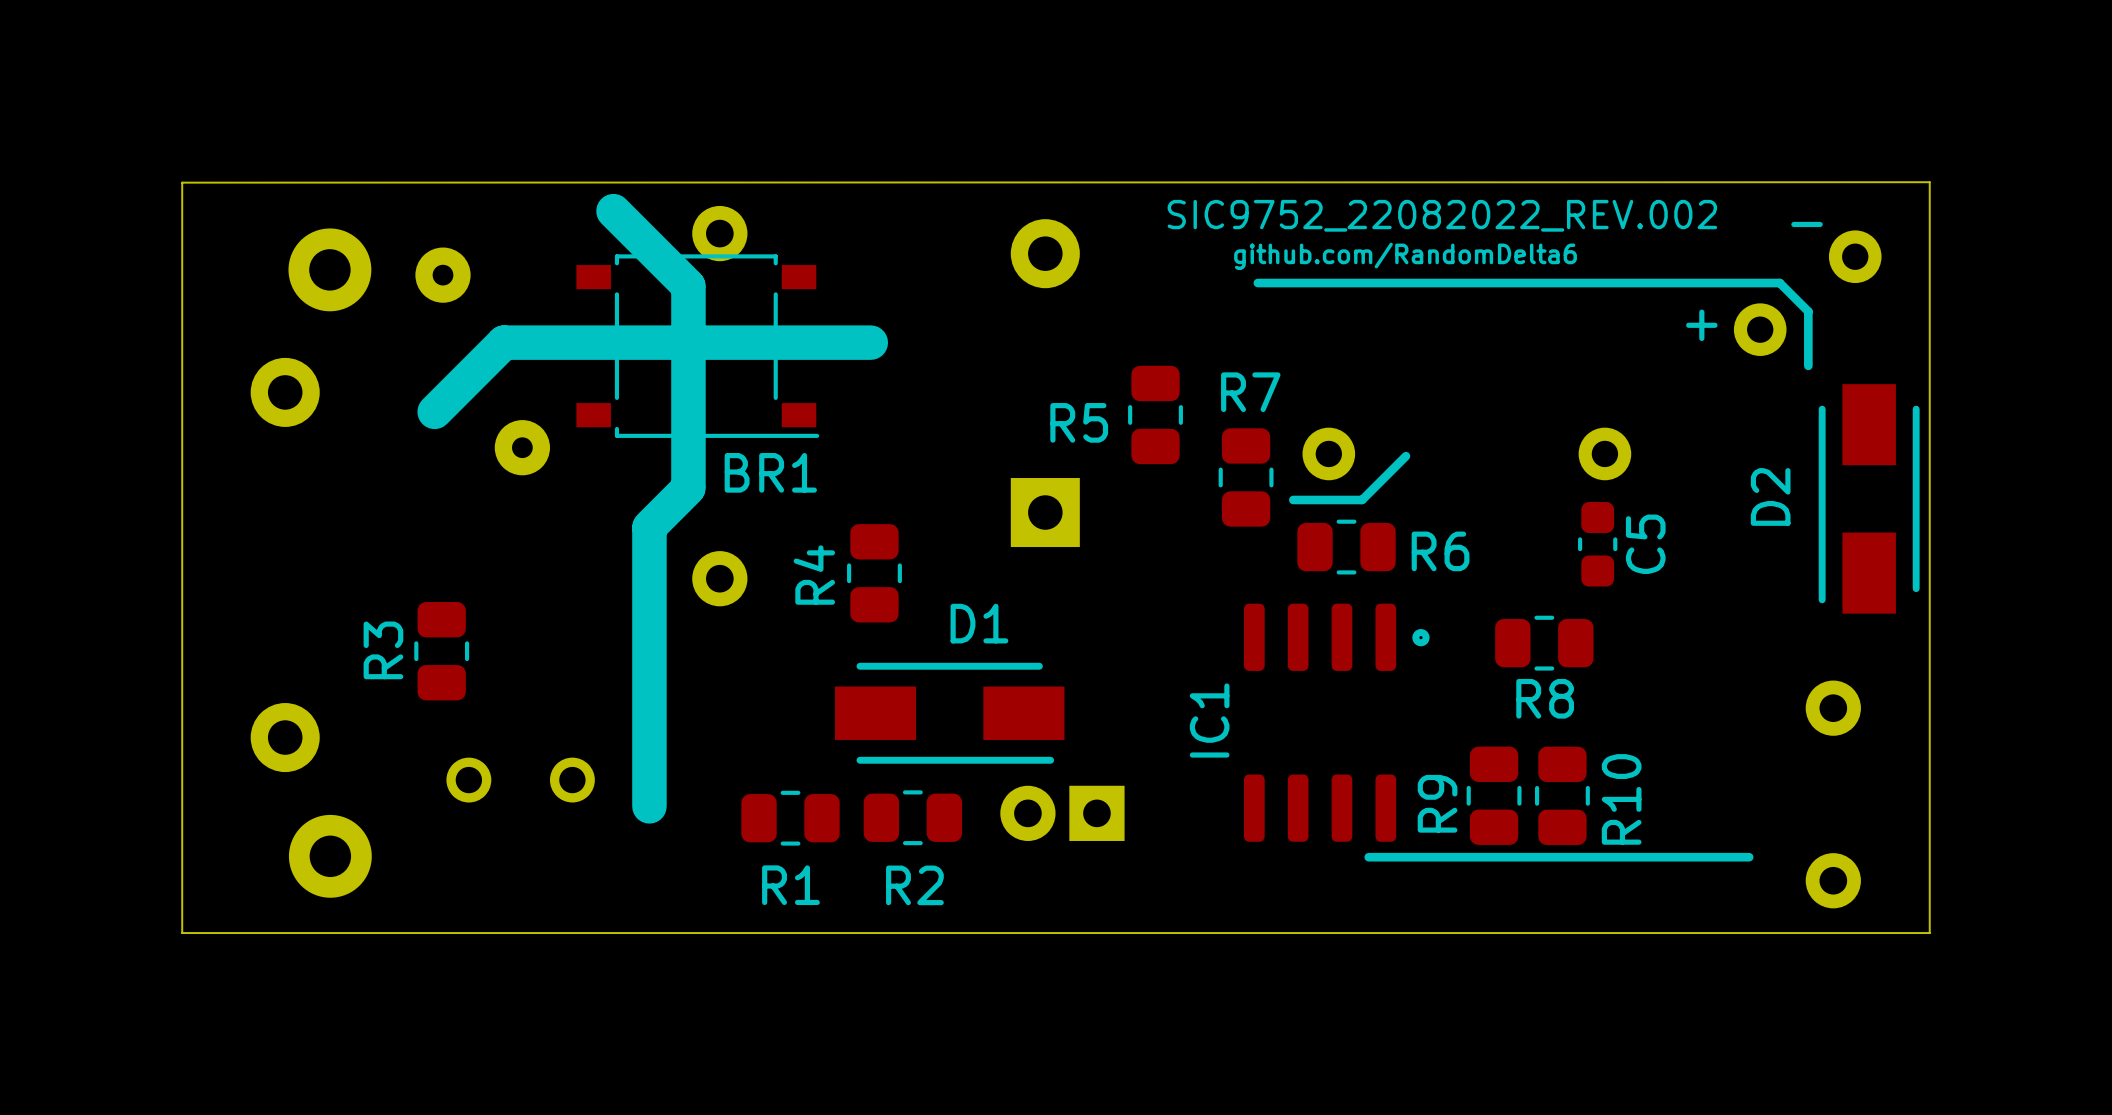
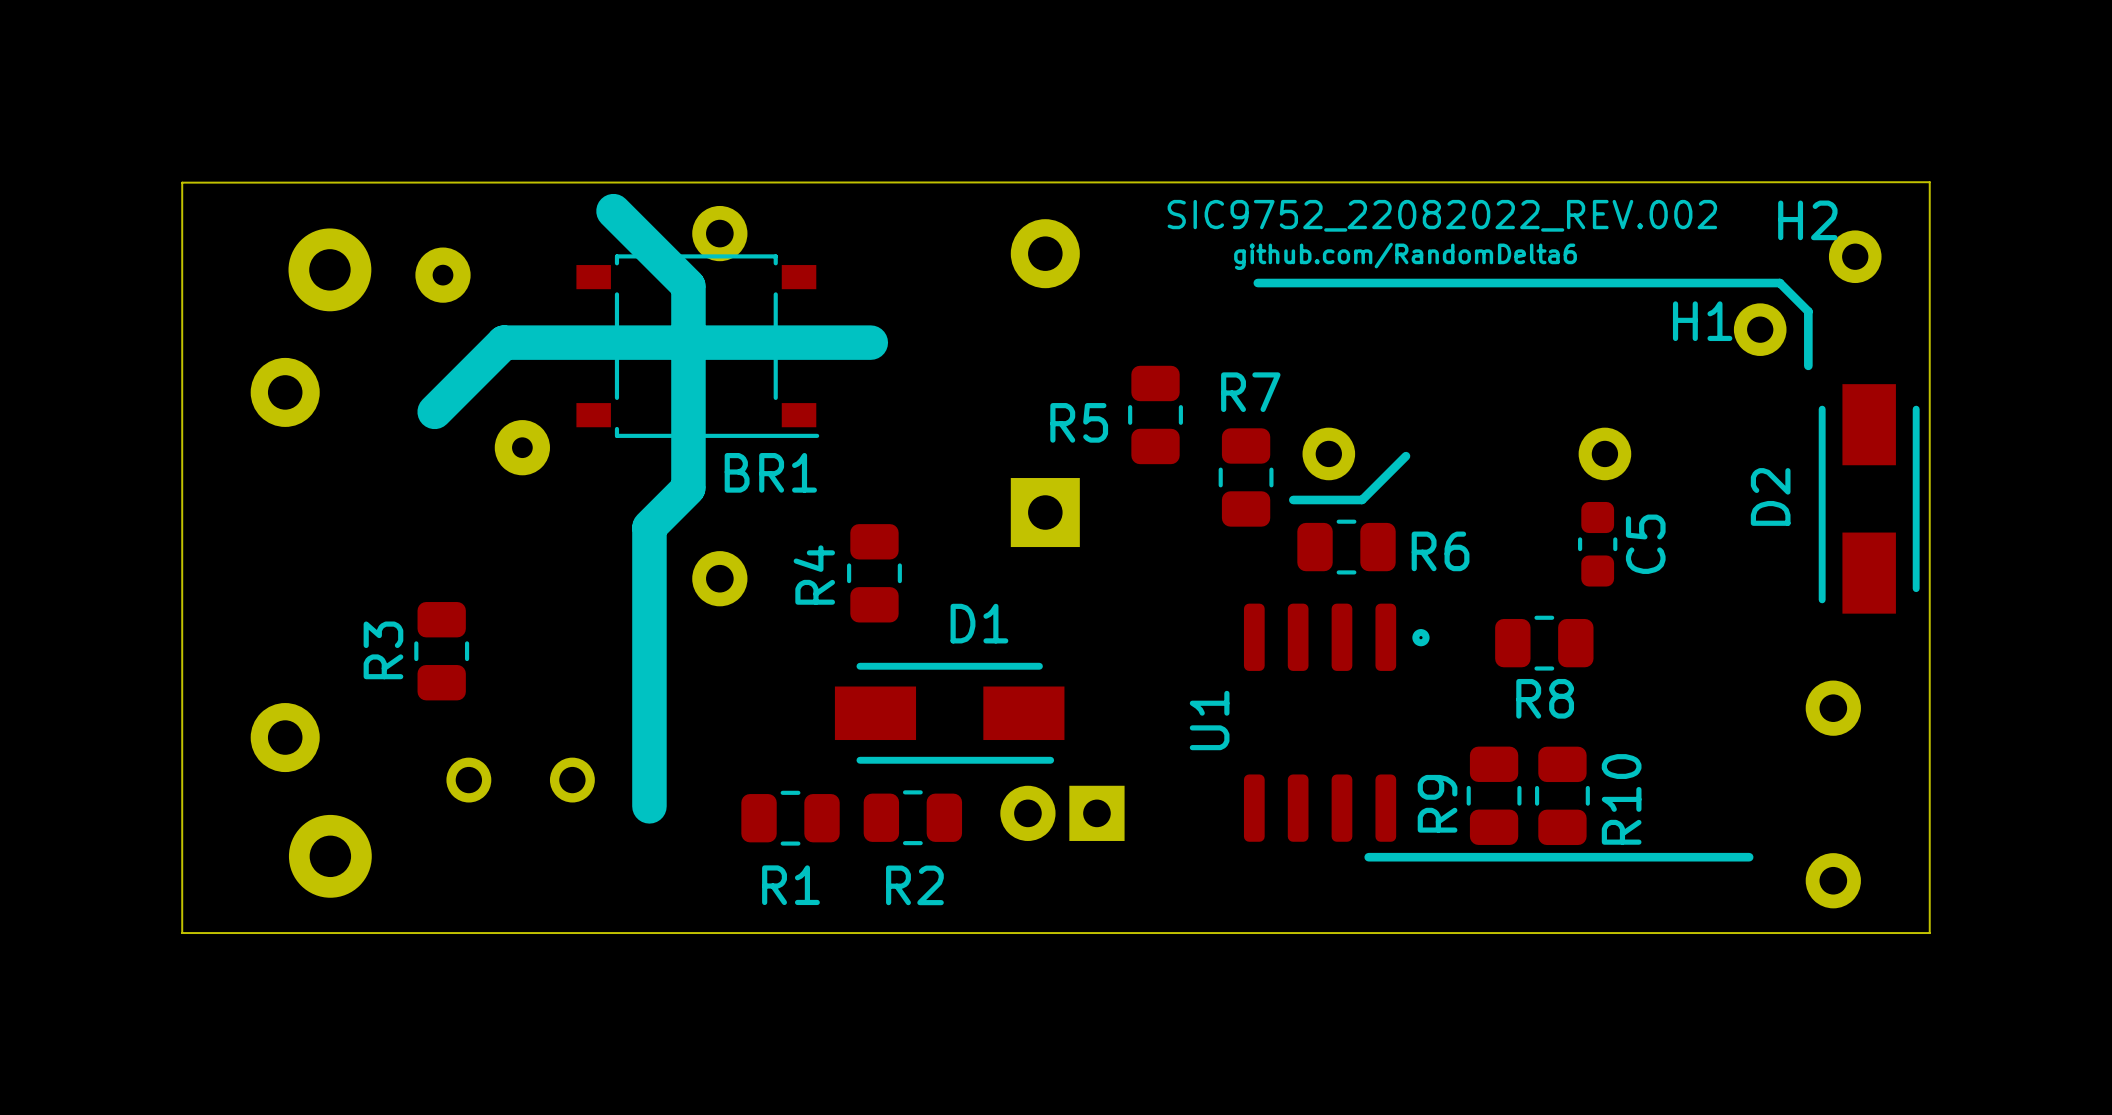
H2 name: - (1807, 224) -> H2 (1807, 220)
H1 name: + (1701, 325) -> H1 (1702, 321)
IC1 name: IC1 (1209, 720) -> U1 (1209, 720)

